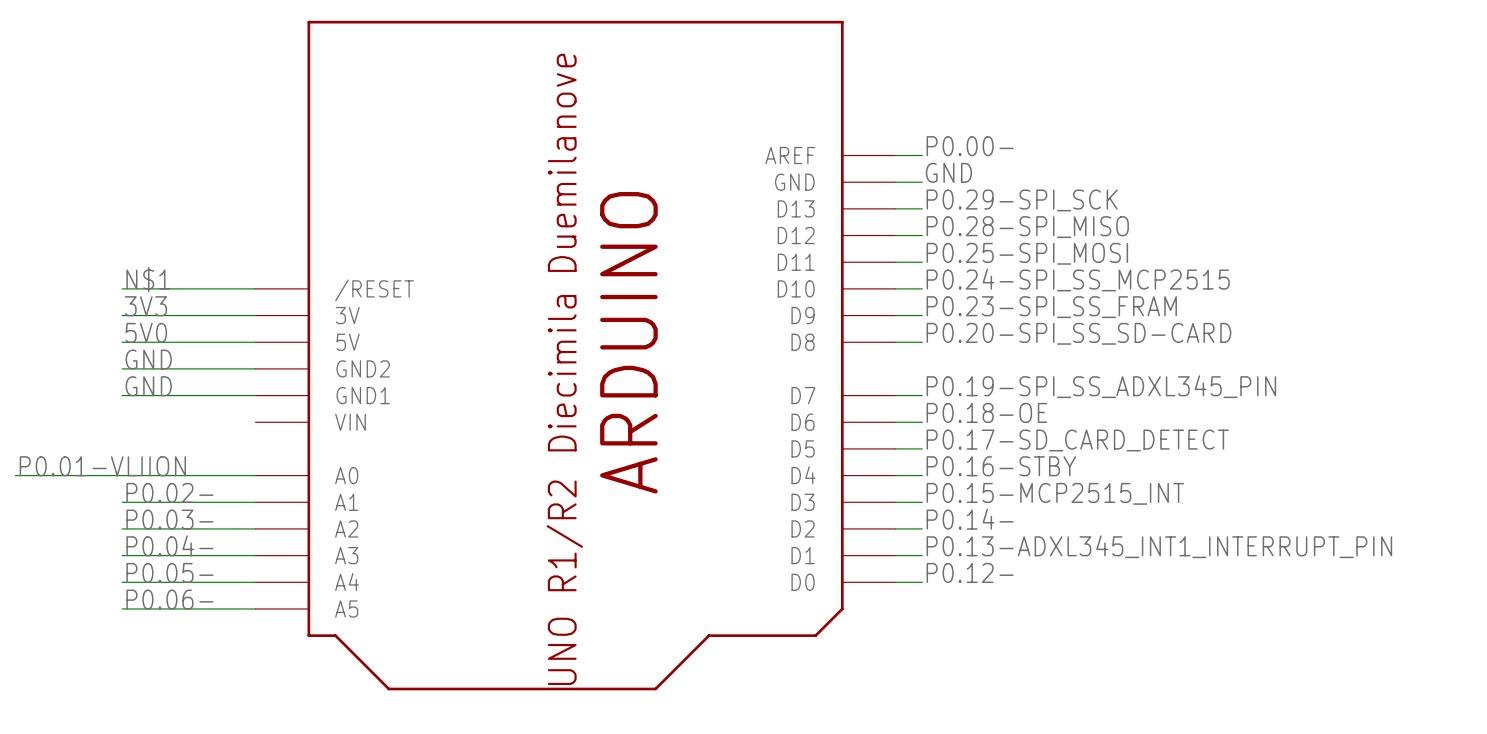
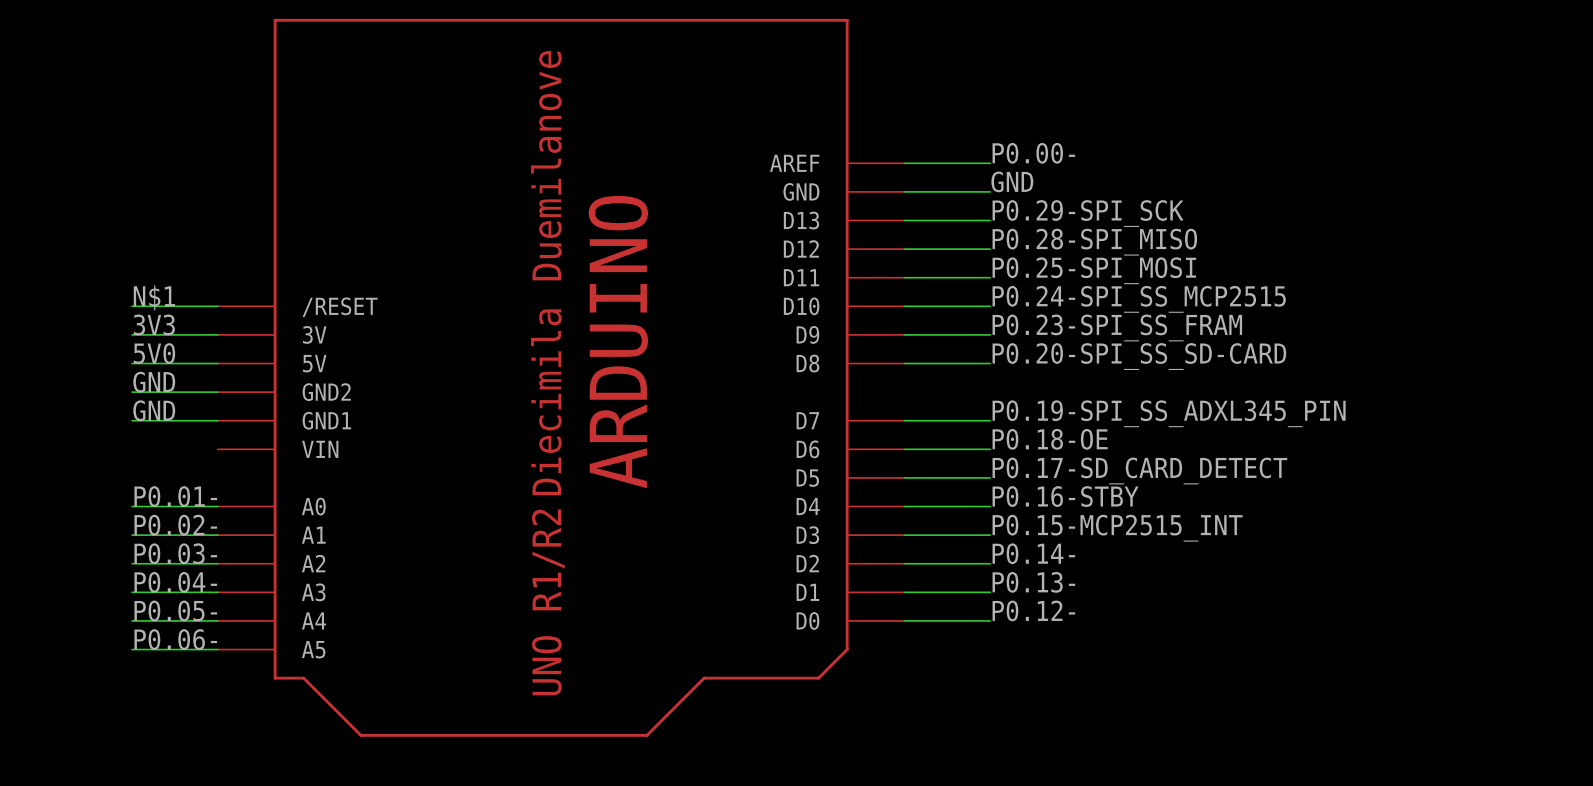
part position: (575, 355) -> (561, 377)
label: P0.01-VLIION (102, 466) -> P0.01- (175, 496)
wire: (15, 475) (122, 475) -> none
label: P0.13-ADXL345_INT1_INTERRUPT_PIN (1159, 546) -> P0.13- (1033, 582)

